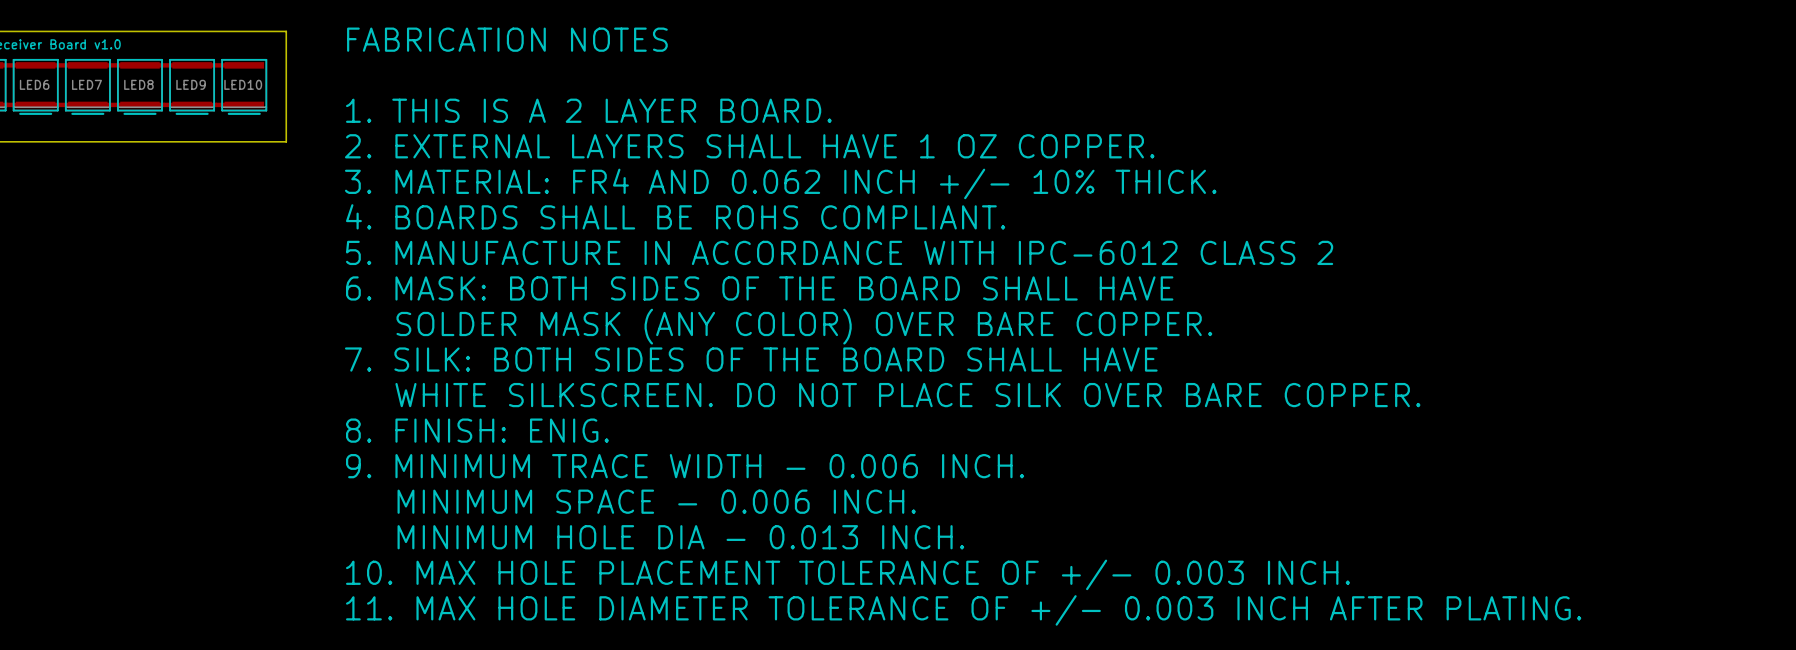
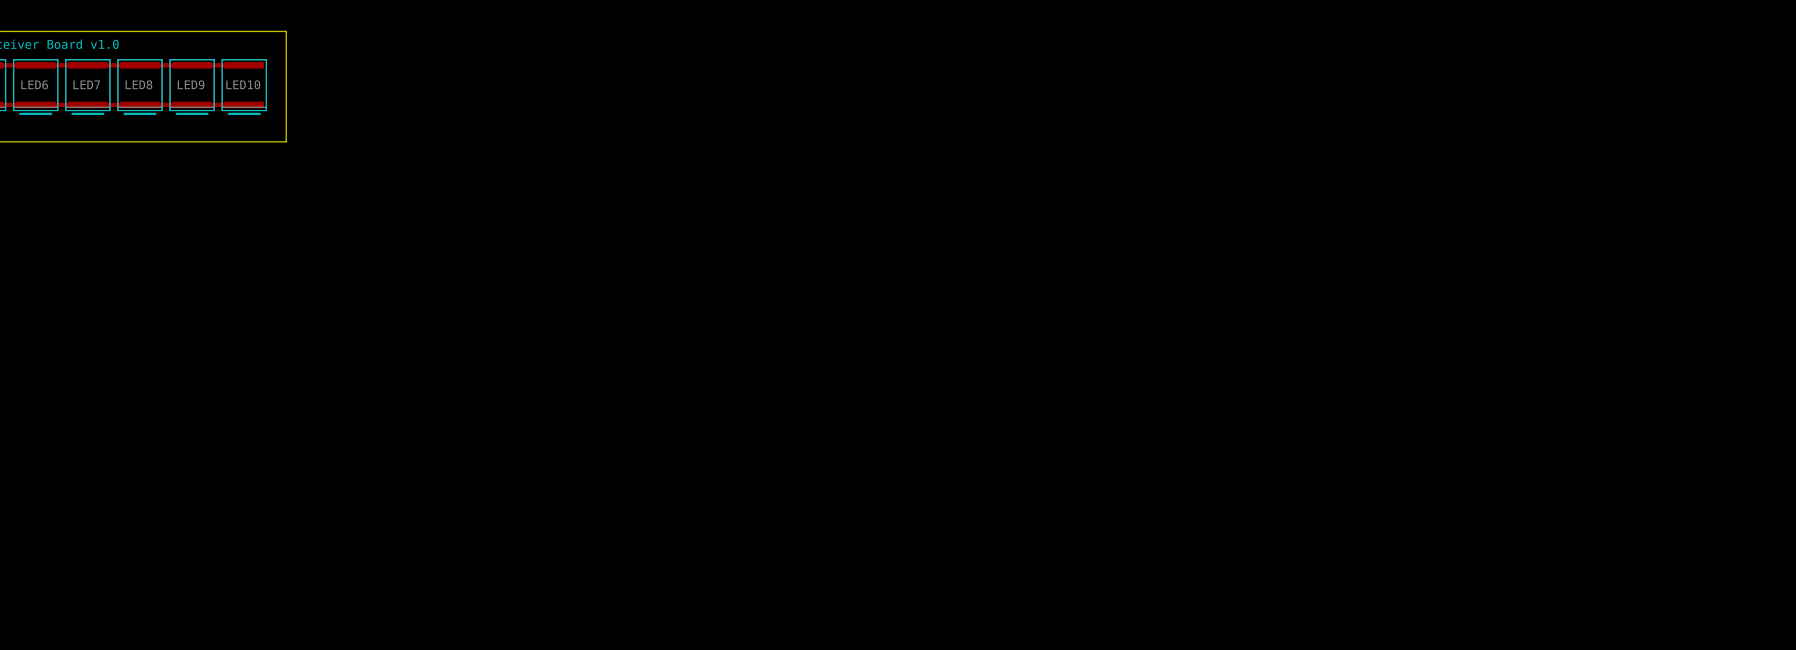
text: FABRICATION NOTES (507, 39) -> none
text: 1. THIS IS A 2 LAYER BOARD. (588, 110) -> none
text: 2. EXTERNAL LAYERS SHALL HAVE 1 OZ COPPER. (749, 146) -> none
text: 3. MATERIAL: FR4 AND 0.062 INCH +/- 10% THICK. (780, 183) -> none
text: 4. BOARDS SHALL BE ROHS COMPLIANT. (675, 216) -> none
text: 5. MANUFACTURE IN ACCORDANCE WITH IPC-6012 CLASS 2 (839, 252) -> none
text: 6. MASK: BOTH SIDES OF THE BOARD SHALL HAVE (759, 288) -> none
text: SOLDER MASK (ANY COLOR) OVER BARE COPPER. (804, 326) -> none
text: 7. SILK: BOTH SIDES OF THE BOARD SHALL HAVE (751, 359) -> none
text: WHITE SILKSCREEN. DO NOT PLACE SILK OVER BARE COPPER. (907, 395) -> none
text: 8. FINISH: ENIG. (477, 430) -> none
text: 9. MINIMUM TRACE WIDTH - 0.006 INCH. (685, 466) -> none
text: MINIMUM SPACE - 0.006 INCH. (656, 501) -> none
text: MINIMUM HOLE DIA - 0.013 INCH. (680, 537) -> none
text: 10. MAX HOLE PLACEMENT TOLERANCE OF +/- 0.003 INCH. (848, 574) -> none
text: 11. MAX HOLE DIAMETER TOLERANCE OF +/- 0.003 INCH AFTER PLATING. (963, 610) -> none

